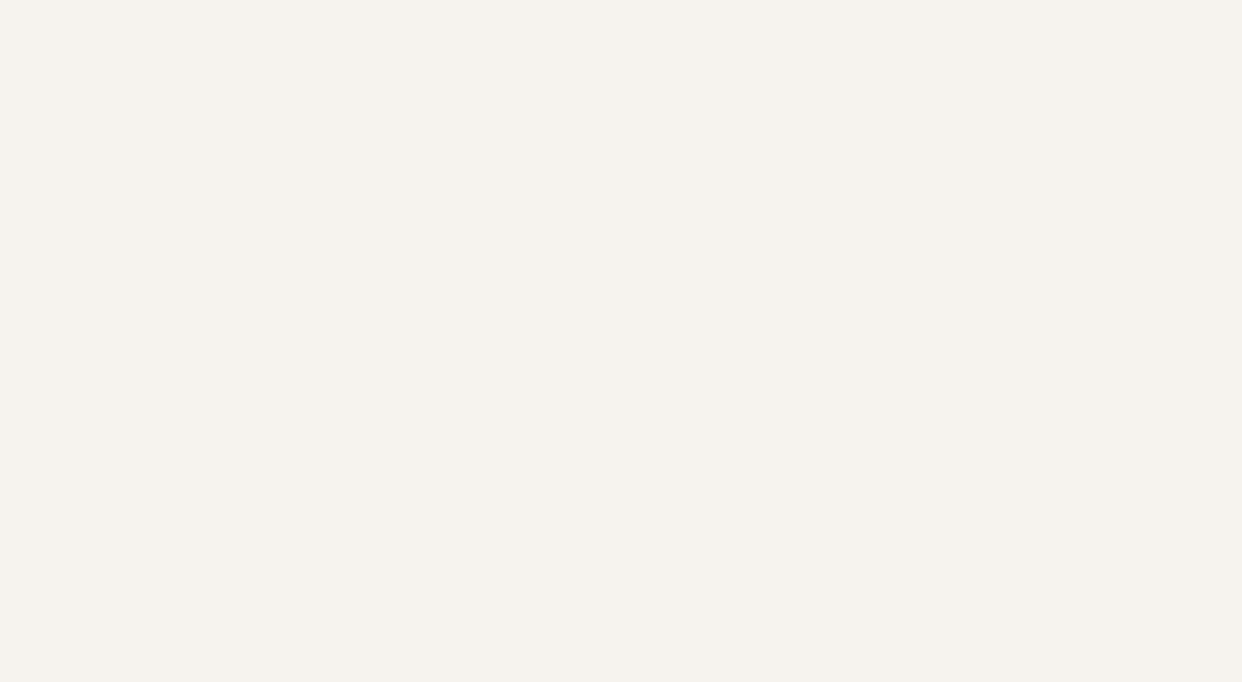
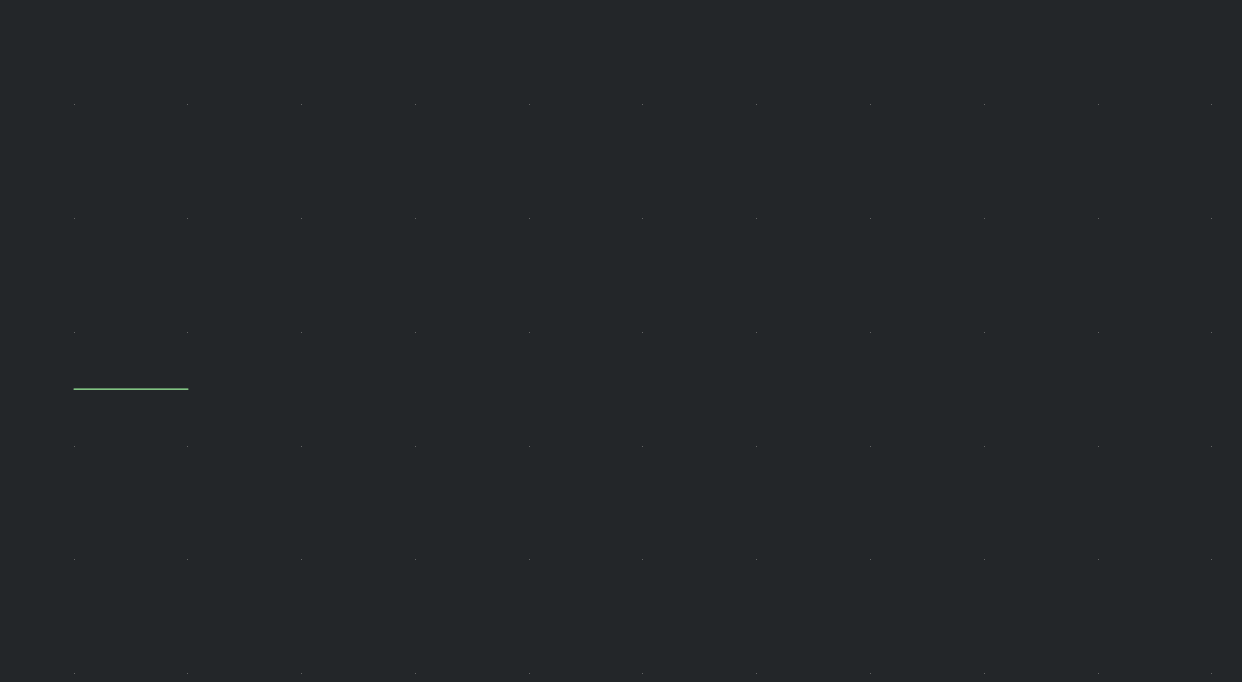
wire: none -> (74, 389) (187, 389)

